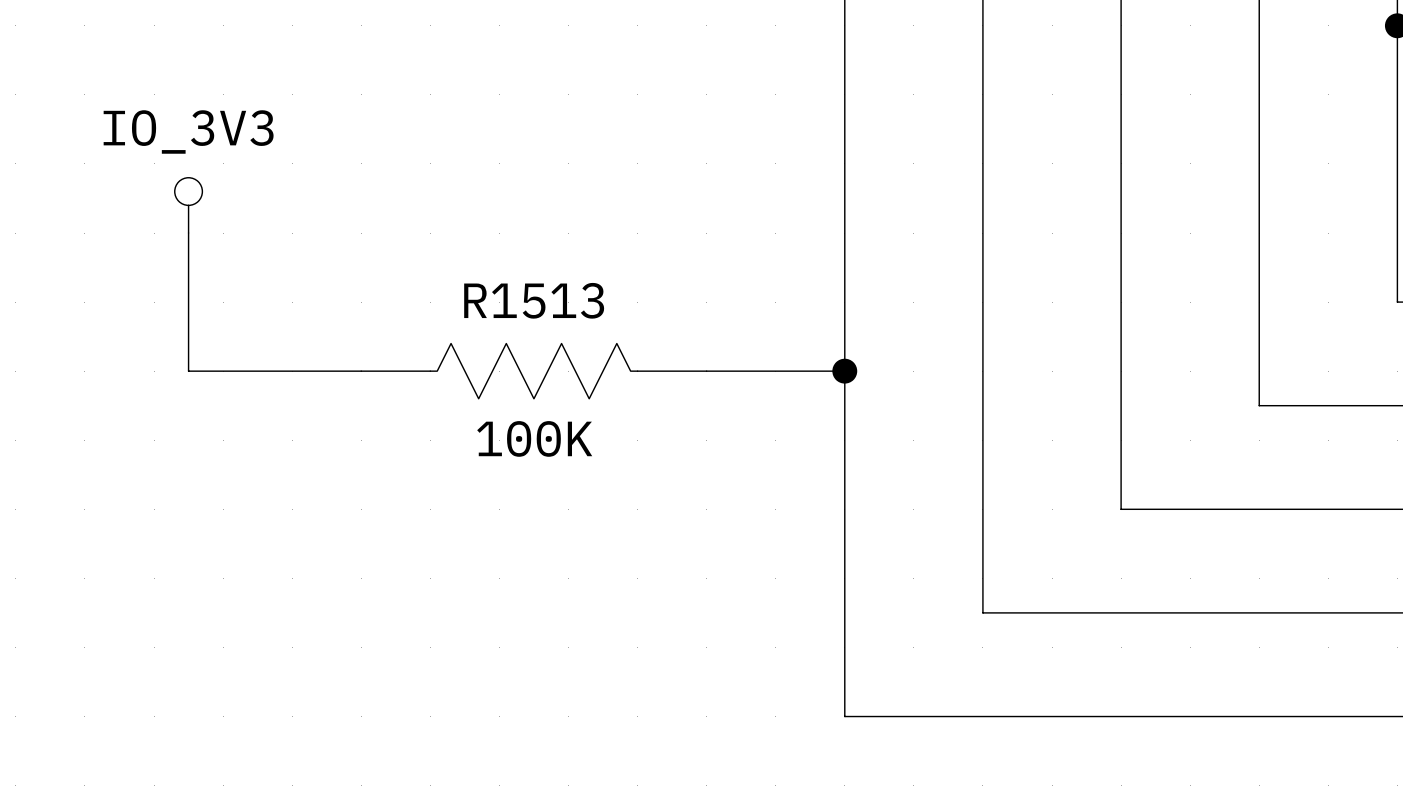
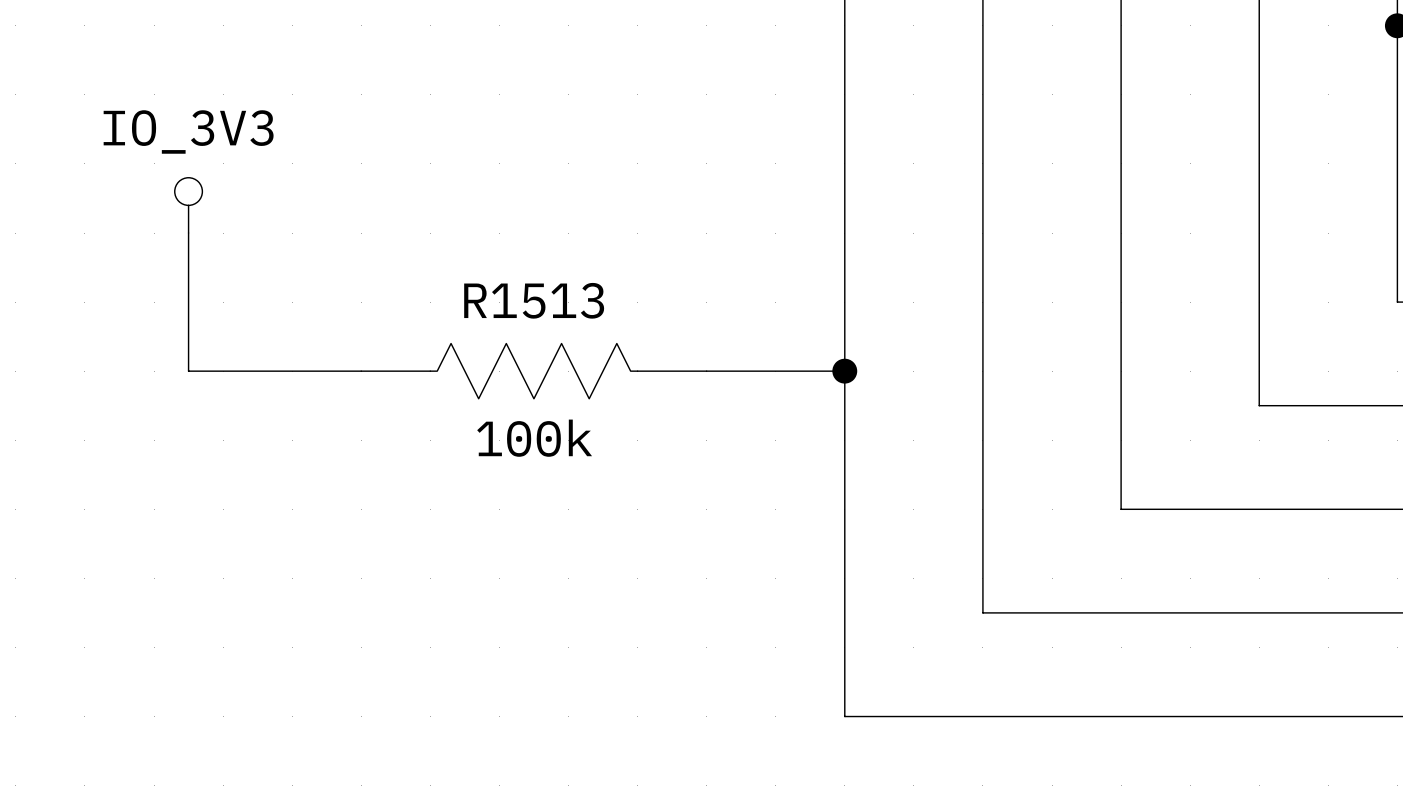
R1513 value: 100K (534, 438) -> 100k (534, 438)

